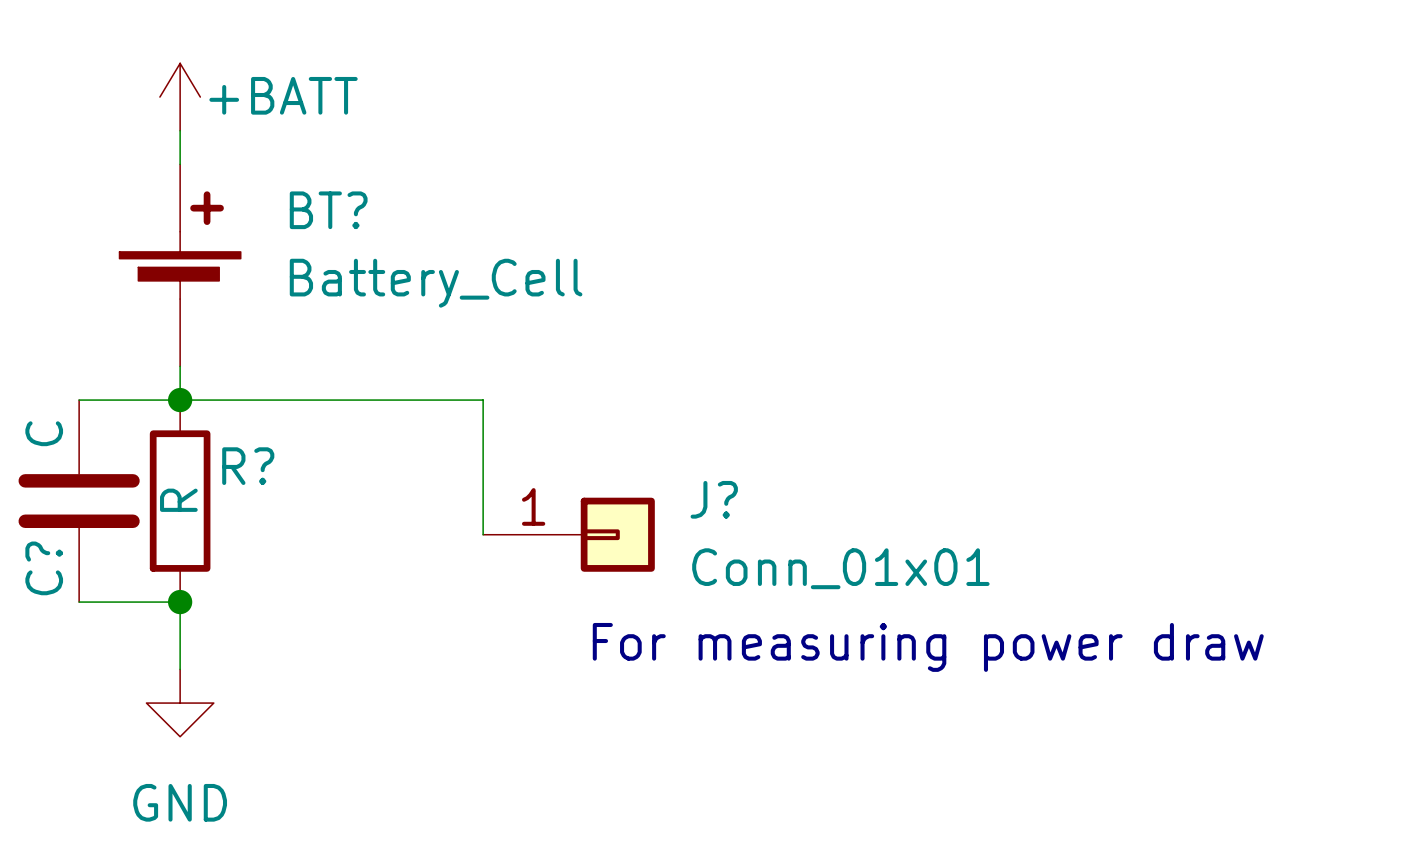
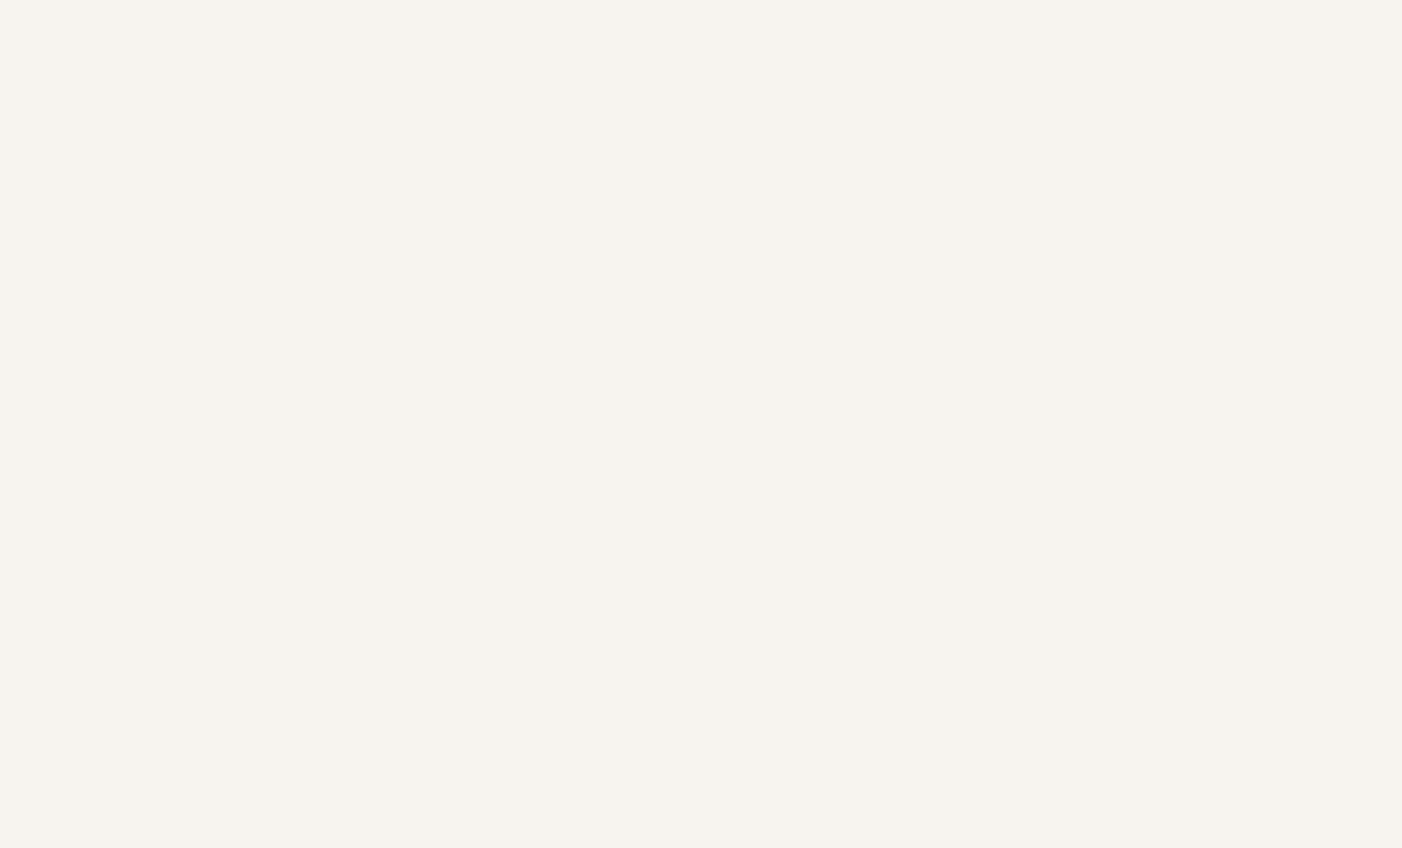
power symbol: +BATT (180, 97) -> none
wire: (180, 130) (180, 164) -> none
BT?: Battery_Cell (180, 265) -> none
wire: (180, 366) (180, 400) -> none
wire: (79, 400) (483, 400) (483, 534) -> none
junction: (180, 400) -> none
C?: C (79, 501) -> none
R?: R (180, 501) -> none
J?: Conn_01x01 (568, 534) -> none
wire: (79, 602) (180, 602) (180, 669) -> none
junction: (180, 602) -> none
text: For measuring power draw (928, 647) -> none
power symbol: GND (180, 703) -> none

